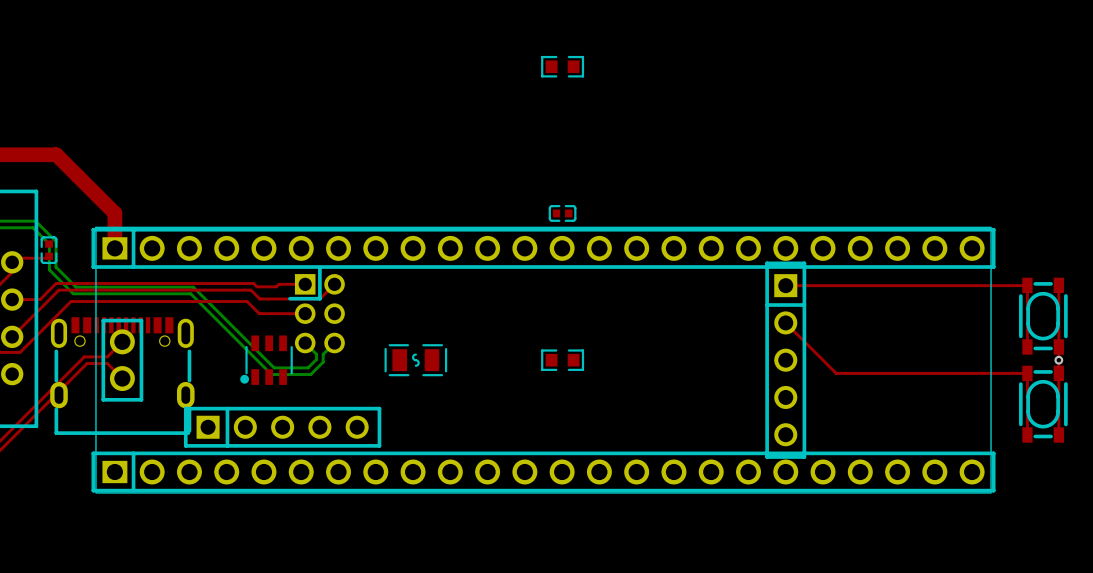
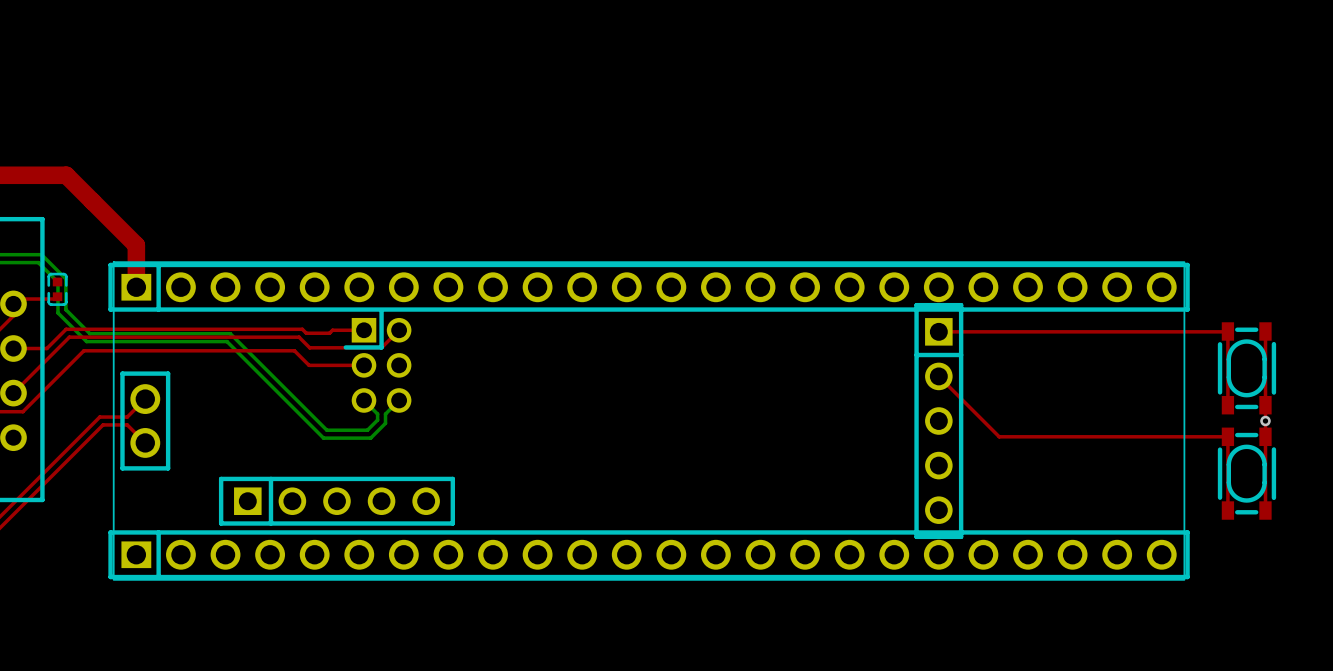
part: (562, 66) -> none
part: (562, 213) -> none
part: (266, 360) -> none
part: (415, 360) -> none
part: (562, 360) -> none
part: (122, 376) -> none

